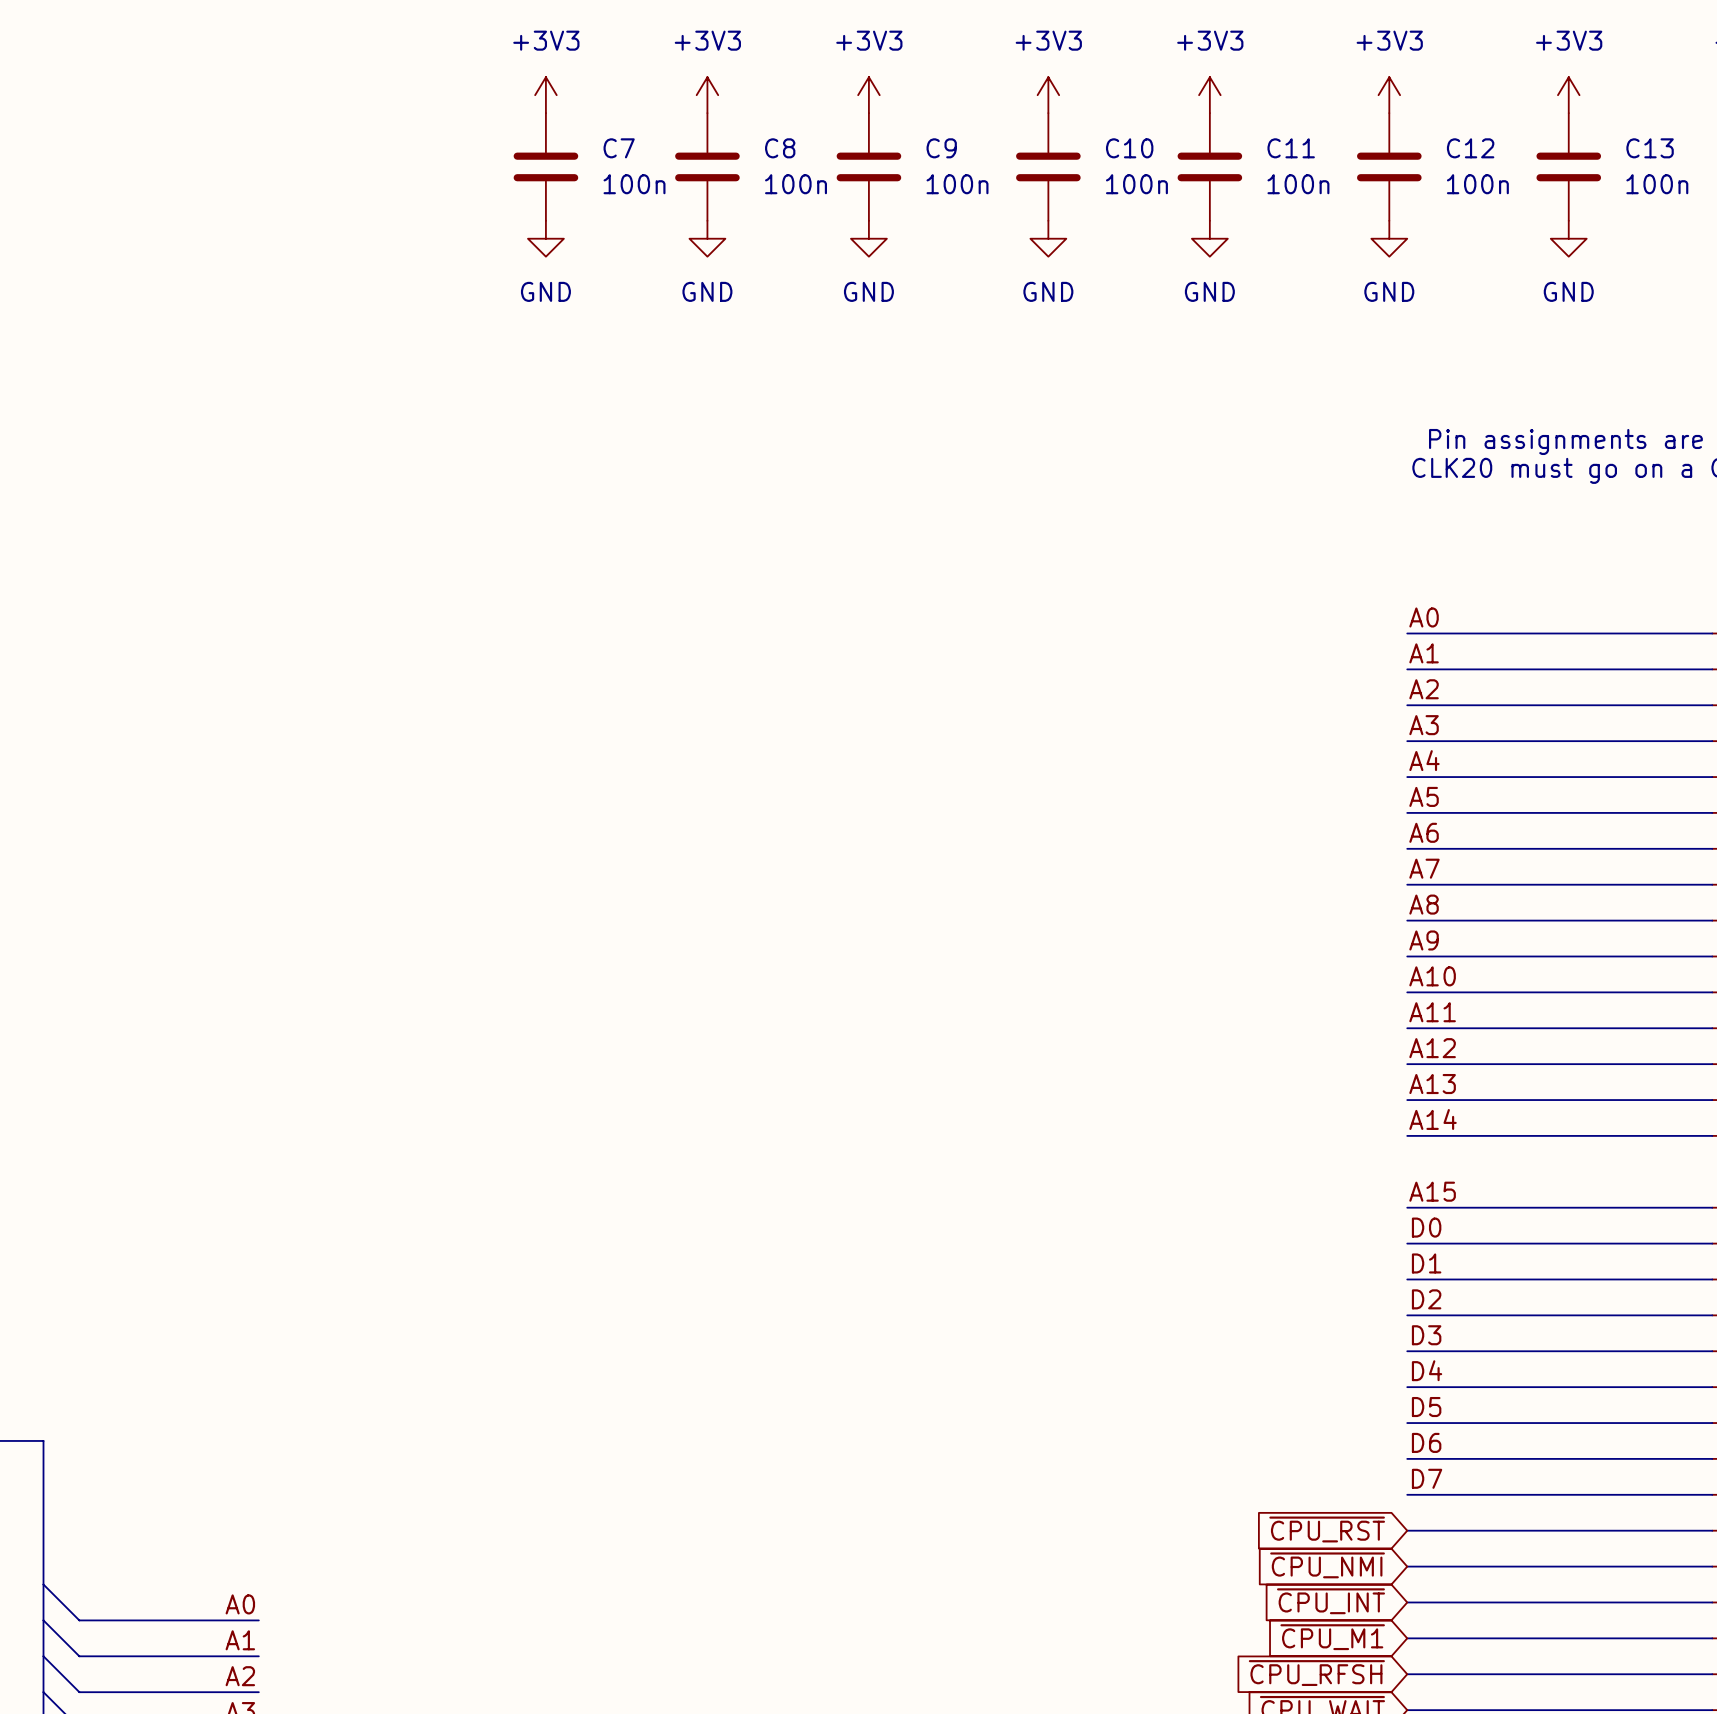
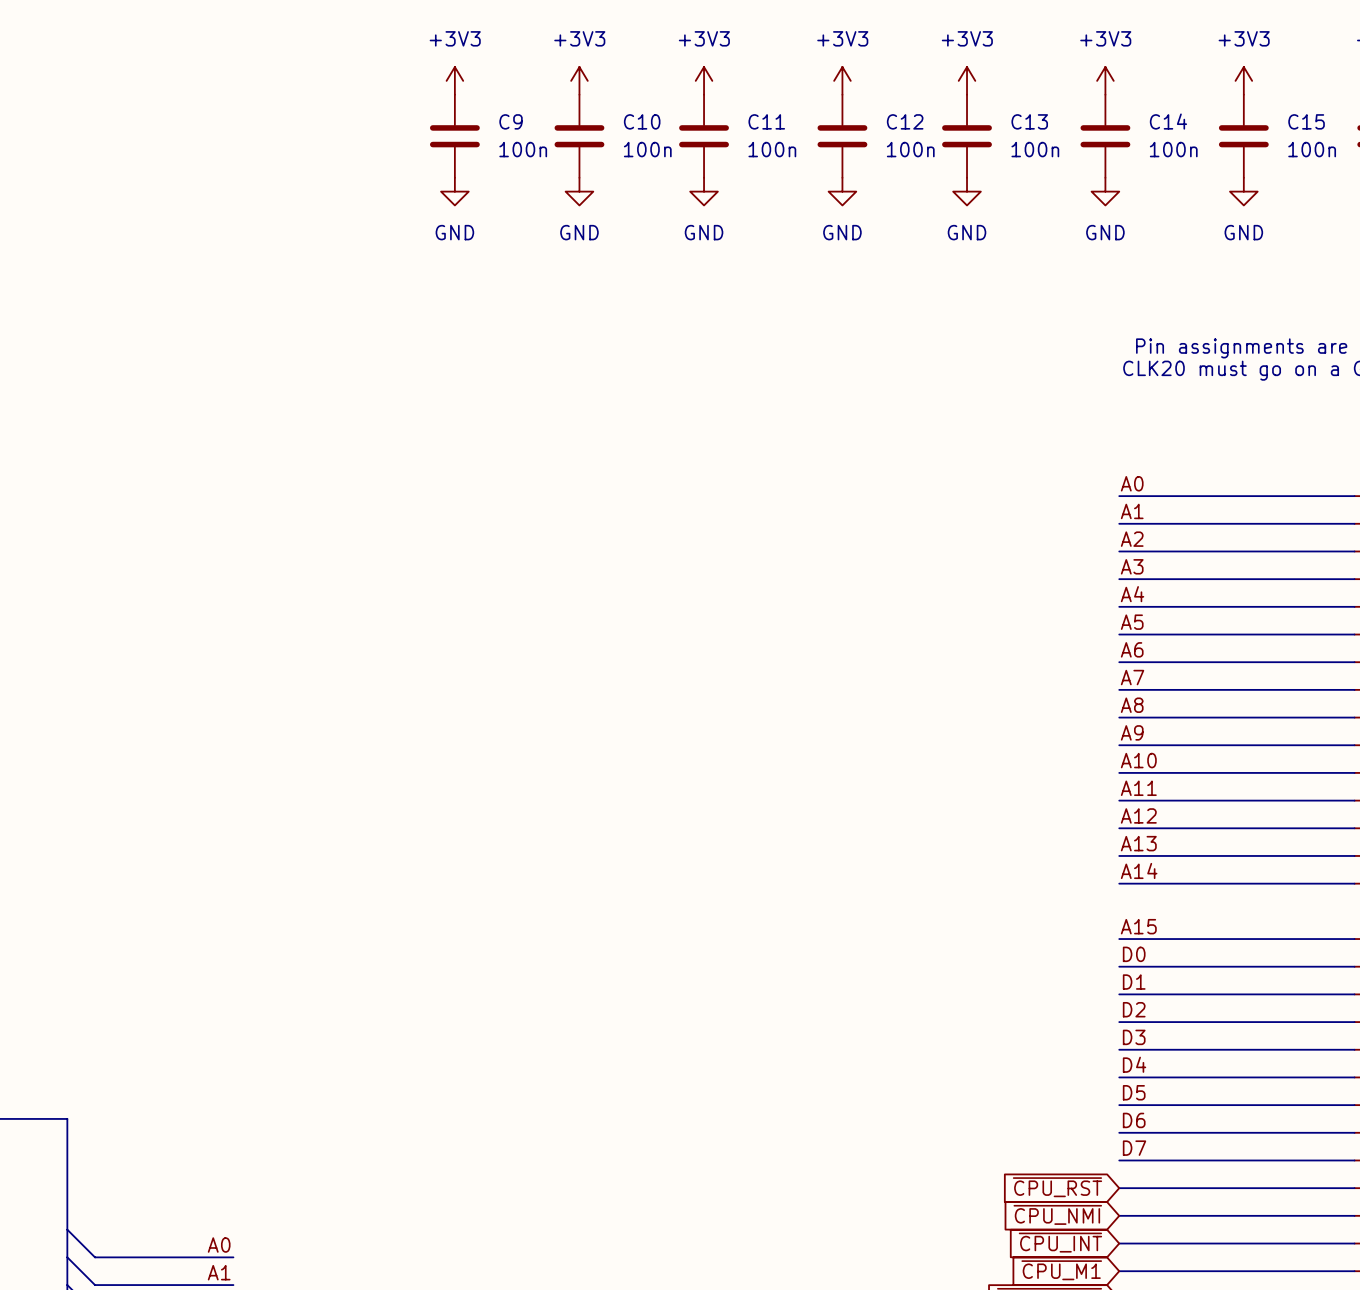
C7 name: C7 (619, 148) -> C9 (511, 121)
C8 name: C8 (780, 148) -> C10 (642, 121)
C9 name: C9 (941, 148) -> C11 (766, 121)
C10 name: C10 (1129, 148) -> C12 (905, 121)
C11 name: C11 (1291, 148) -> C13 (1029, 121)
C12 name: C12 (1470, 148) -> C14 (1168, 121)
C13 name: C13 (1650, 148) -> C15 (1306, 121)

